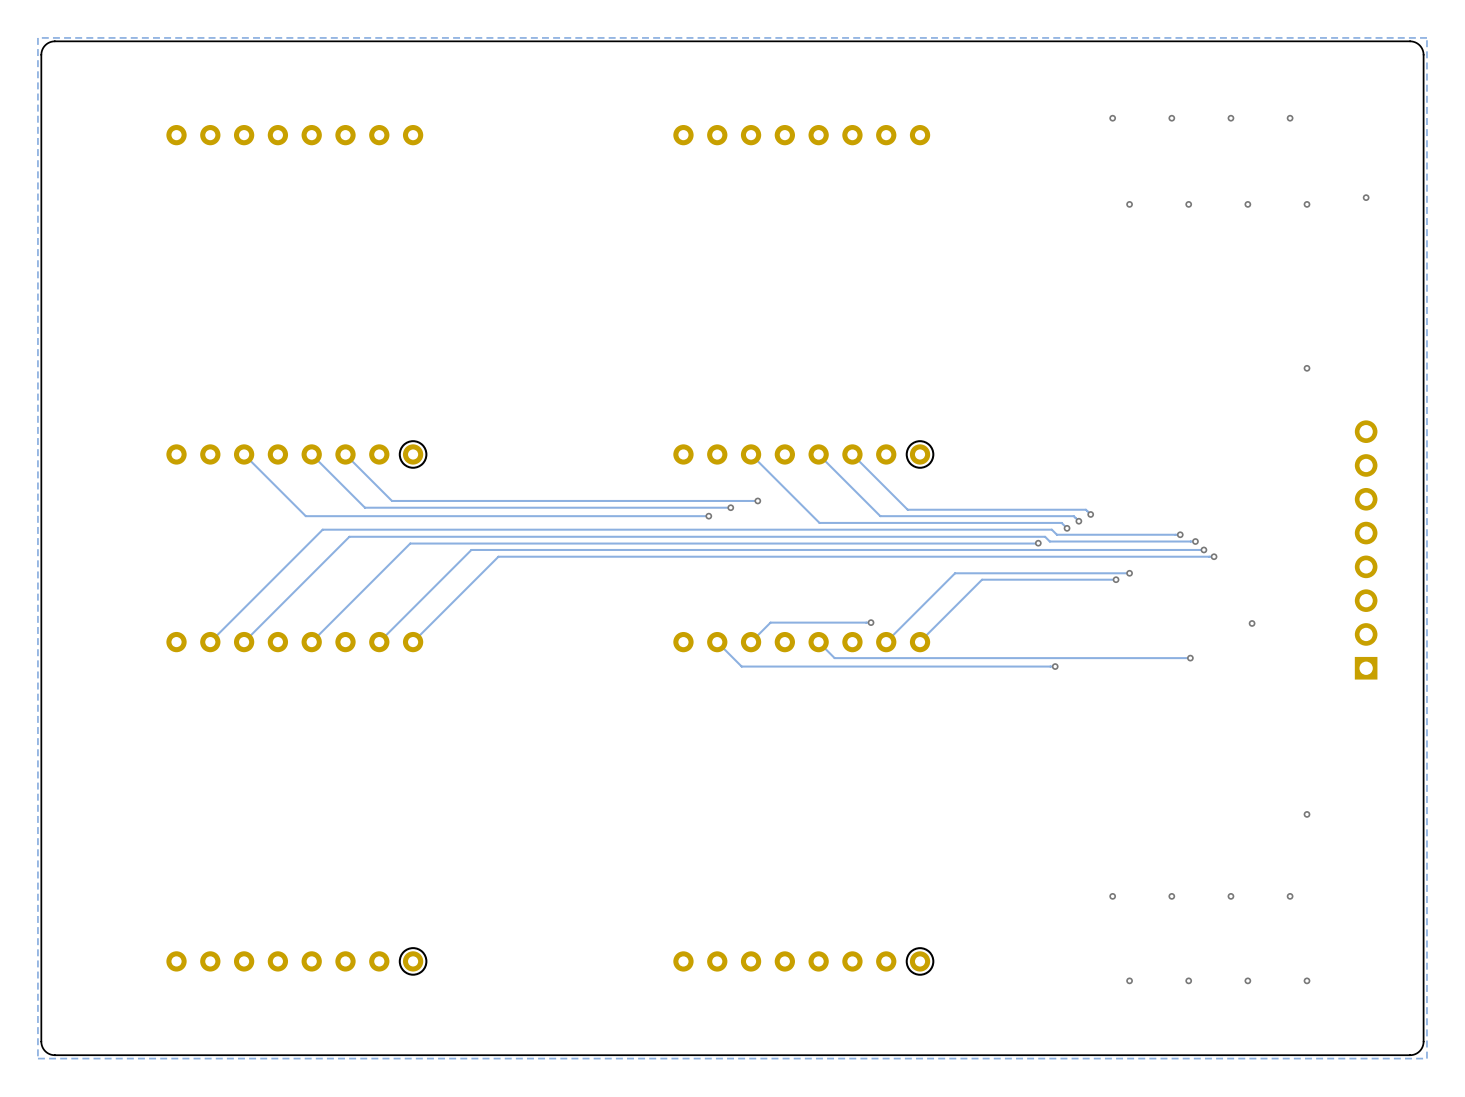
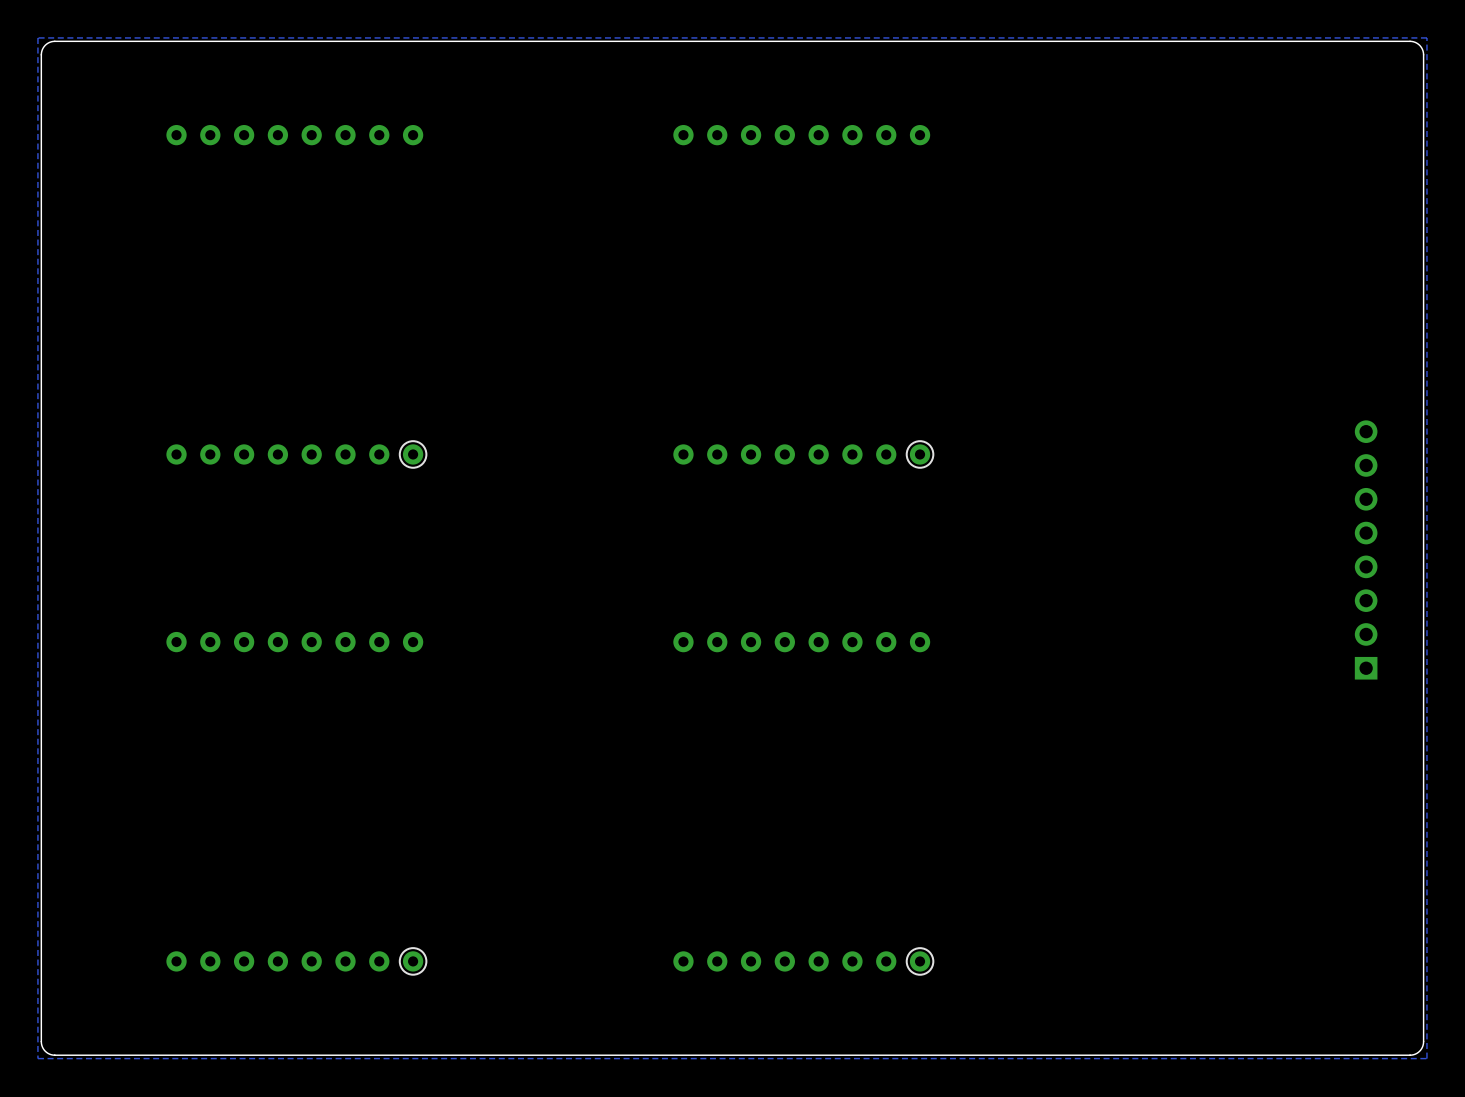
via: (1112, 118) -> none
via: (1171, 118) -> none
via: (1230, 118) -> none
via: (1290, 118) -> none
via: (1366, 197) -> none
via: (1129, 204) -> none
via: (1188, 204) -> none
via: (1247, 204) -> none
via: (1306, 204) -> none
via: (1306, 368) -> none
track: (244, 454) (305, 516) (708, 516) -> none
track: (311, 454) (364, 507) (730, 507) -> none
track: (345, 454) (391, 500) (757, 500) -> none
track: (751, 454) (819, 522) (1061, 522) (1067, 528) -> none
track: (818, 454) (880, 516) (1073, 516) (1078, 521) -> none
track: (852, 454) (907, 509) (1085, 509) (1090, 514) -> none
via: (757, 500) -> none
via: (730, 507) -> none
via: (1090, 514) -> none
via: (708, 516) -> none
via: (1078, 521) -> none
via: (1067, 528) -> none
track: (1180, 534) (1056, 534) (1051, 529) (322, 529) (210, 642) -> none
via: (1180, 534) -> none
track: (1195, 541) (1049, 541) (1045, 536) (349, 536) (244, 642) -> none
via: (1195, 541) -> none
track: (1038, 543) (410, 543) (311, 642) -> none
via: (1038, 543) -> none
track: (1203, 549) (471, 549) (379, 642) -> none
via: (1203, 549) -> none
track: (1214, 556) (498, 556) (413, 642) -> none
via: (1214, 556) -> none
track: (1129, 573) (955, 573) (886, 642) -> none
via: (1129, 573) -> none
track: (1116, 579) (982, 579) (920, 642) -> none
via: (1116, 579) -> none
track: (871, 622) (770, 622) (751, 642) -> none
via: (871, 622) -> none
via: (1252, 623) -> none
track: (717, 642) (741, 666) (1055, 666) -> none
track: (818, 642) (834, 658) (1190, 658) -> none
via: (1190, 658) -> none
via: (1055, 666) -> none
via: (1306, 814) -> none
via: (1112, 896) -> none
via: (1171, 896) -> none
via: (1230, 896) -> none
via: (1290, 896) -> none
via: (1129, 980) -> none
via: (1188, 980) -> none
via: (1247, 980) -> none
via: (1306, 980) -> none

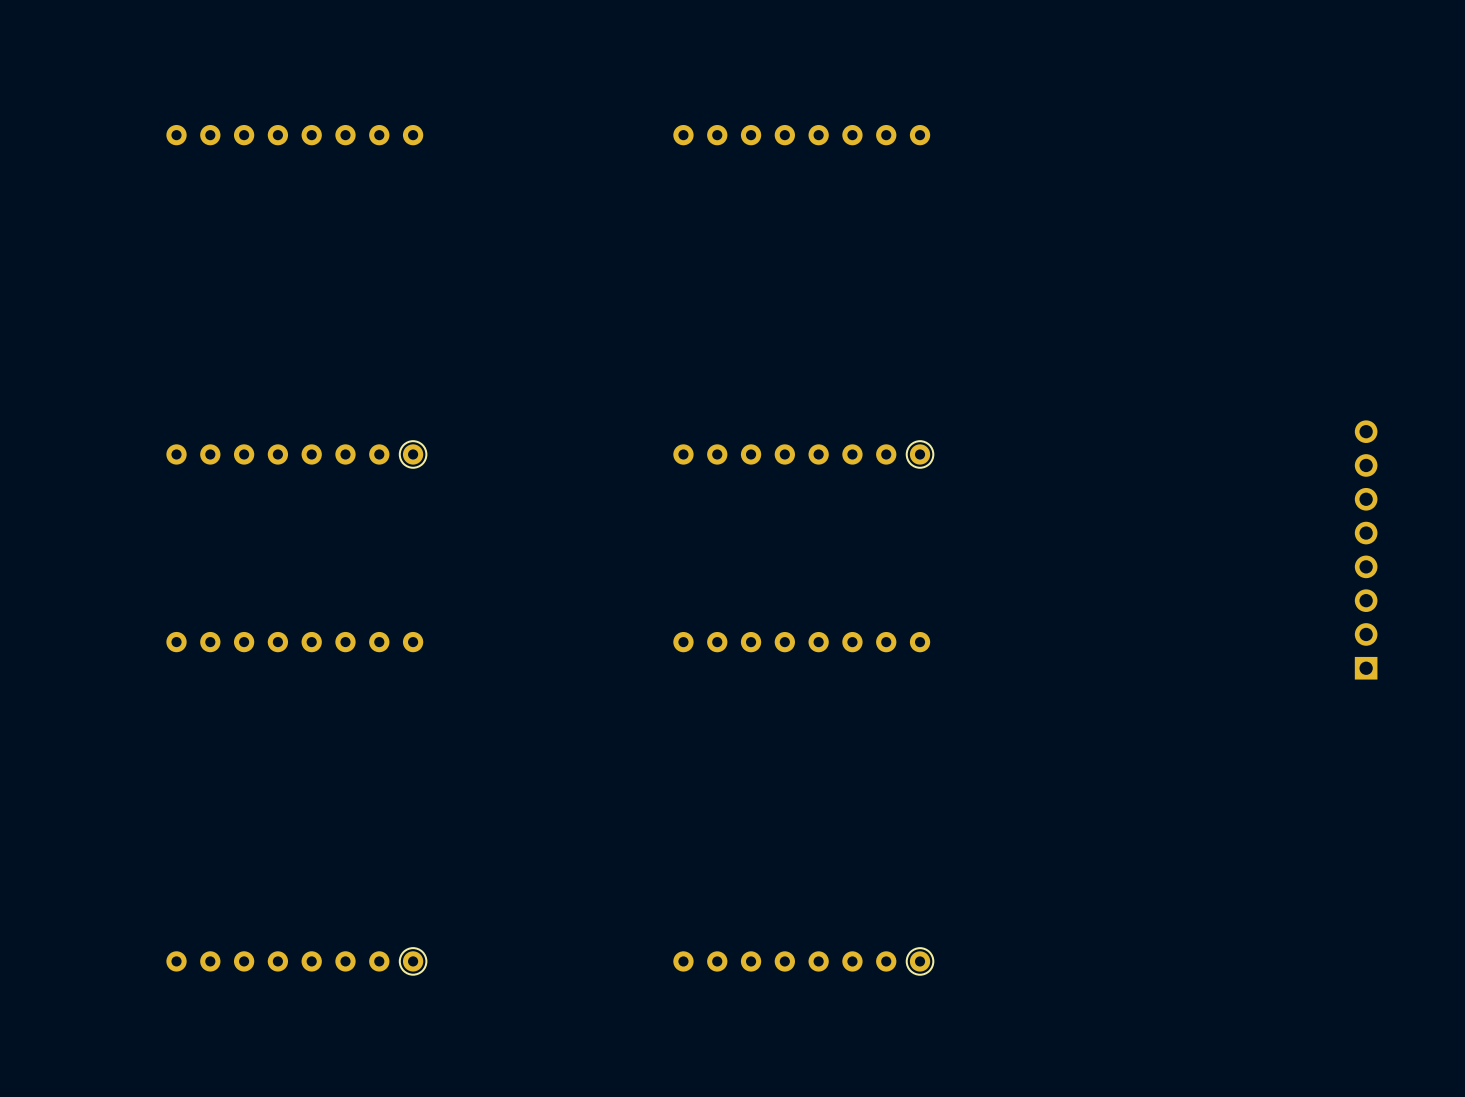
zone outline: (1426, 37) (1426, 1058) (37, 1058) (37, 37) (1426, 37) -> none
board edge: (1410, 41) (54, 41) (46, 44) (41, 54) (41, 1041) (44, 1049) (54, 1055) (1410, 1055) (1418, 1052) (1423, 1041) (1423, 54) (1419, 45) (1410, 41) -> none

